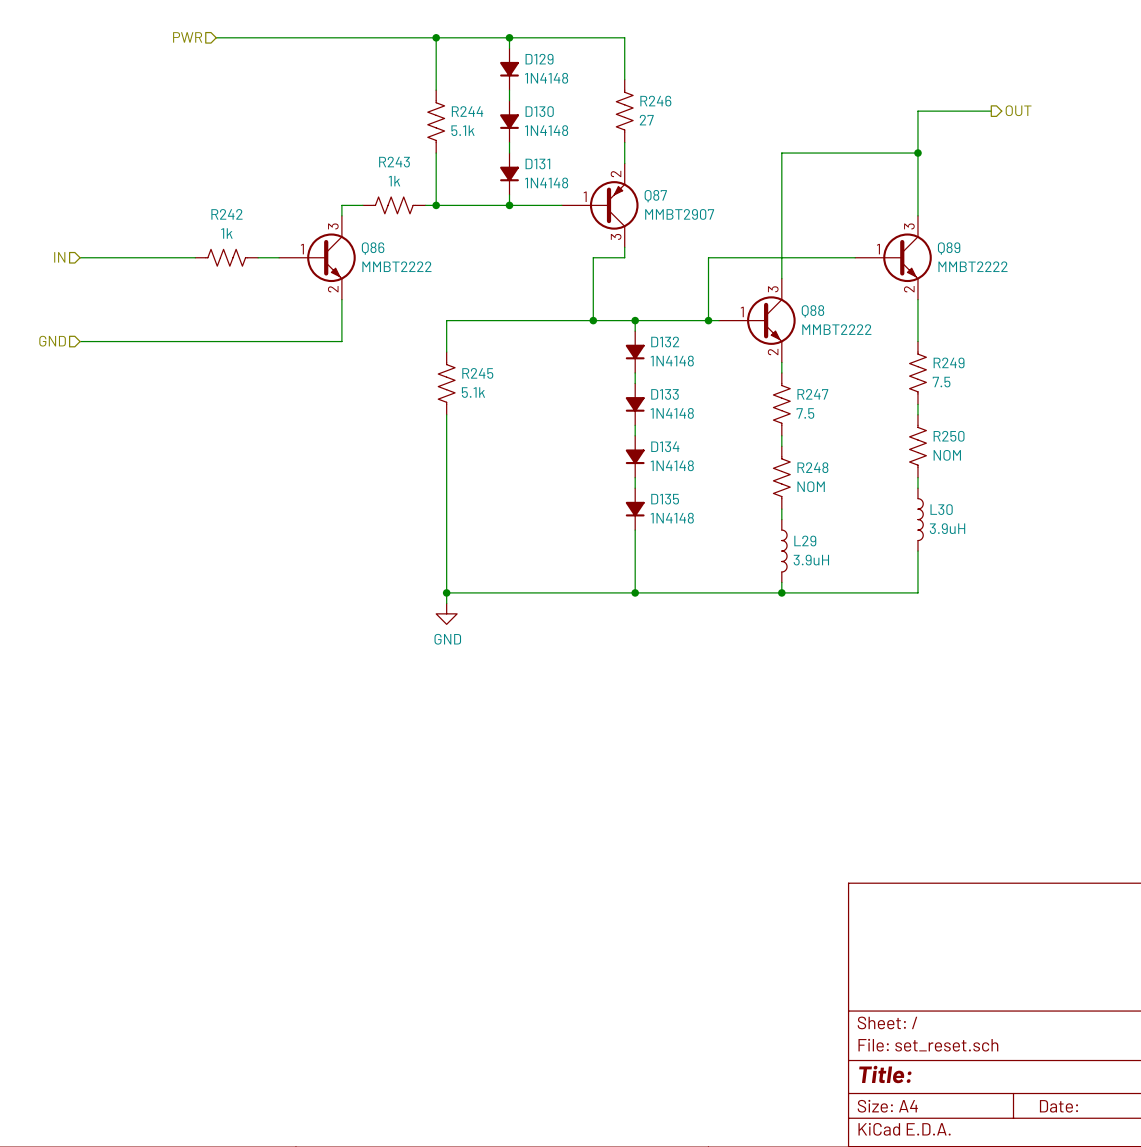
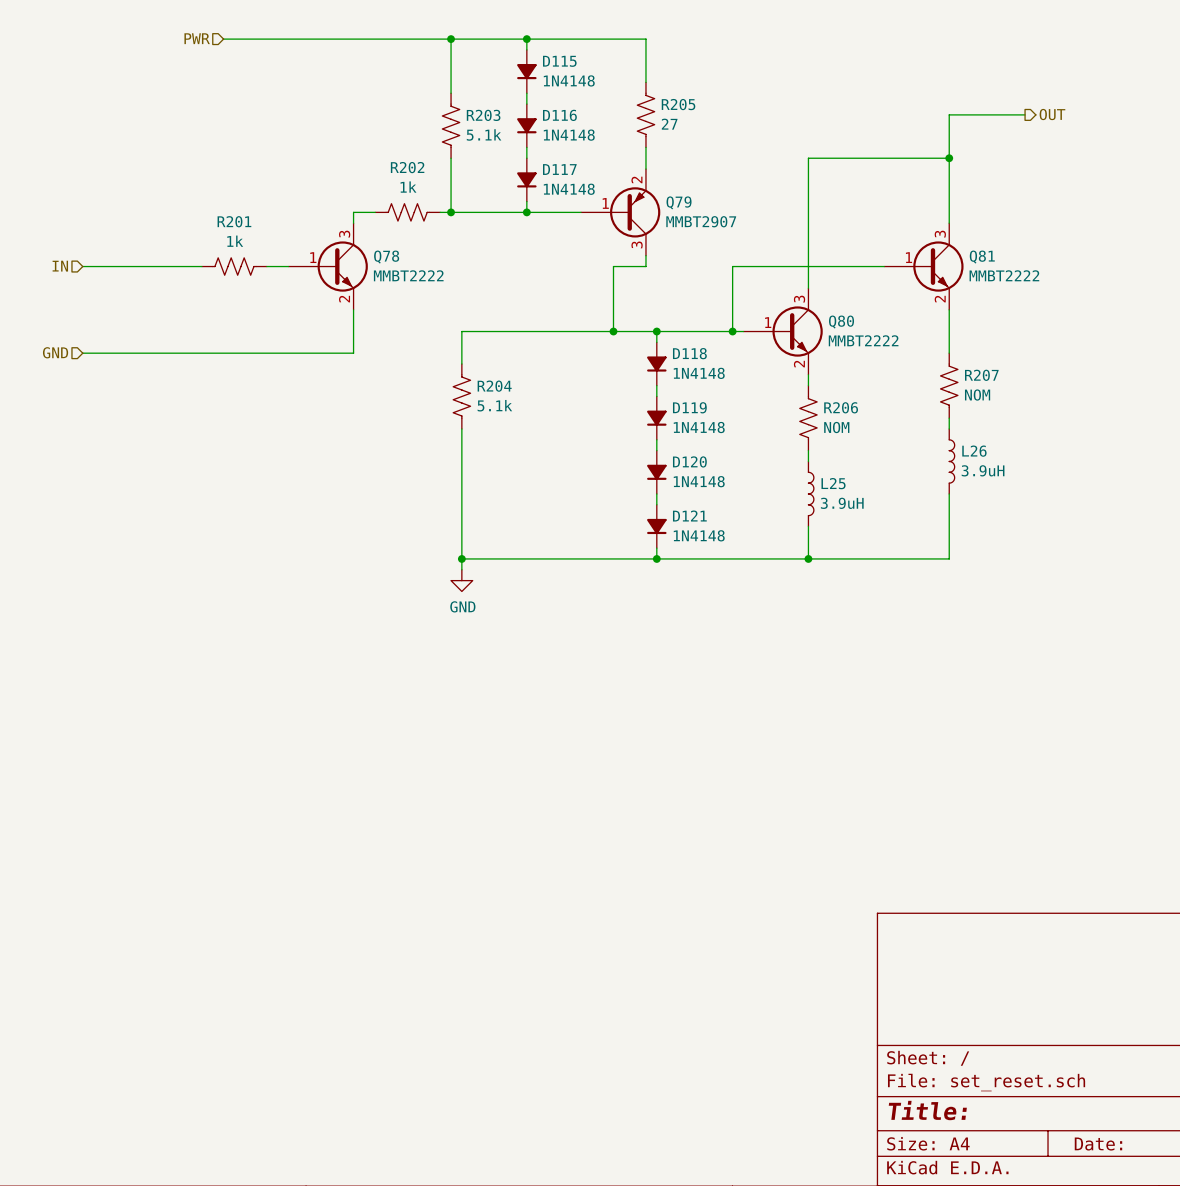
D129 name: D129 (539, 59) -> D115 (559, 61)
R246 name: R246 (655, 101) -> R205 (678, 104)
R244 name: R244 (467, 111) -> R203 (483, 115)
D130 name: D130 (539, 111) -> D116 (559, 115)
R243 name: R243 (394, 162) -> R202 (407, 167)
D131 name: D131 (537, 164) -> D117 (559, 169)
Q87 name: Q87 (655, 196) -> Q79 (679, 202)
R242 name: R242 (226, 214) -> R201 (234, 221)
Q86 name: Q86 (373, 248) -> Q78 (386, 257)
Q89 name: Q89 (949, 248) -> Q81 (982, 257)
Q88 name: Q88 (812, 311) -> Q80 (841, 322)
D132 name: D132 (665, 342) -> D118 (689, 353)
R249 name: R249 (949, 362) -> R207 (981, 375)
R245 name: R245 (477, 373) -> R204 (494, 386)
R249 value: 7.5 (941, 382) -> NOM (977, 395)
D133 name: D133 (665, 394) -> D119 (689, 407)
R247 name: R247 (812, 394) -> R206 (841, 407)
R247 value: 7.5 (805, 413) -> NOM (836, 427)
D134 name: D134 (665, 446) -> D120 (689, 461)
R250: NOM (917, 446) -> none
L26: none -> 3.9uH (951, 461)
R248: NOM (781, 477) -> none
L25: none -> 3.9uH (811, 493)
wire: none -> (949, 504) (949, 558) (461, 558)
D135 name: D135 (665, 499) -> D121 (689, 516)
L30: 3.9uH (920, 519) -> none
junction: none -> (461, 558)
wire: (635, 540) (635, 592) -> none
junction: none -> (656, 558)
junction: none -> (808, 558)
wire: (446, 551) (446, 603) -> none
L29: 3.9uH (784, 551) -> none
wire: (917, 551) (917, 592) (446, 592) -> none
wire: (781, 582) (781, 592) -> none
junction: (446, 592) -> none
junction: (635, 592) -> none
junction: (781, 592) -> none
power symbol position: GND (446, 613) -> GND (461, 580)

